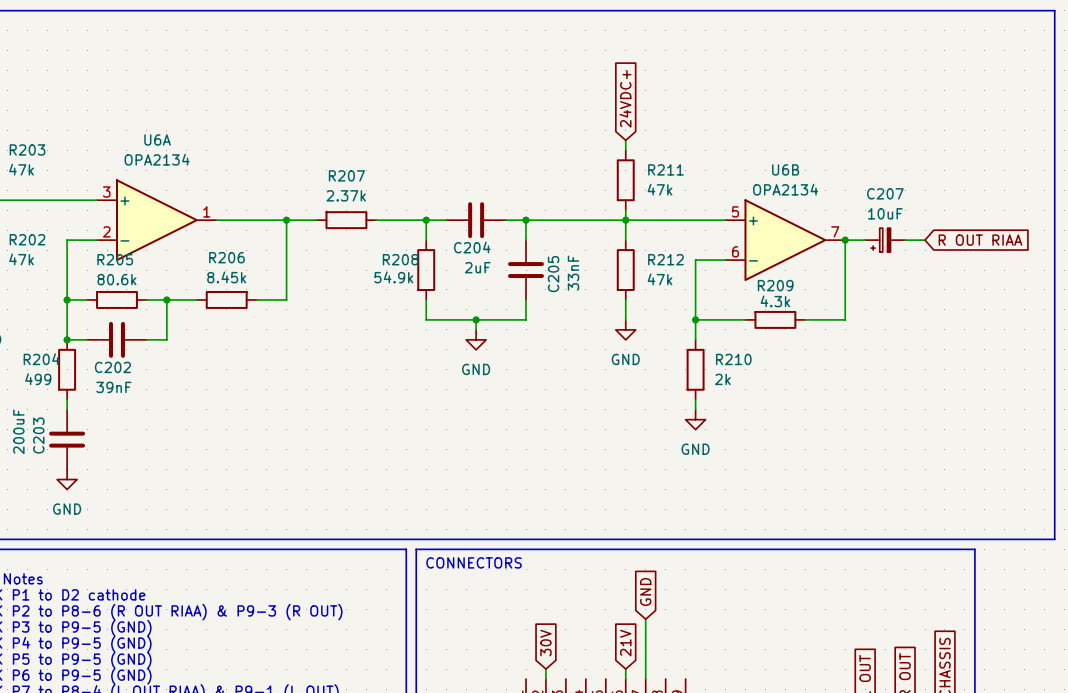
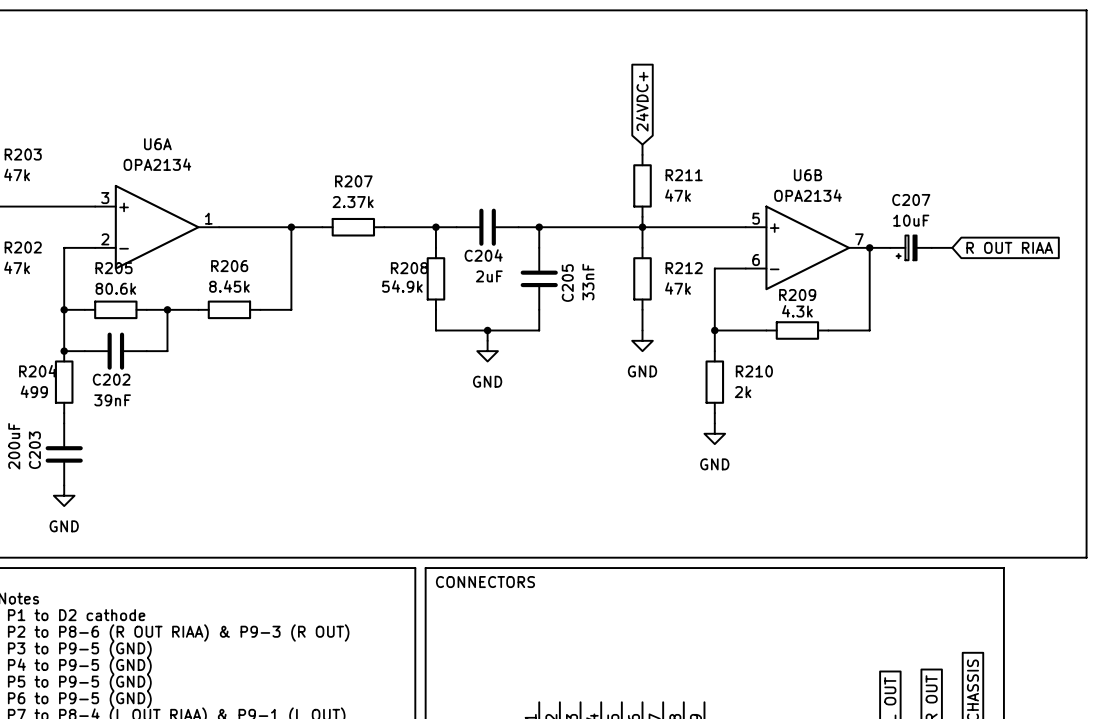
global label: GND (645, 591) -> none
wire: (645, 619) (645, 679) -> none
global label: 30V (545, 643) -> none
global label: 21V (625, 643) -> none
wire: (545, 669) (545, 679) -> none
wire: (625, 669) (625, 679) -> none

